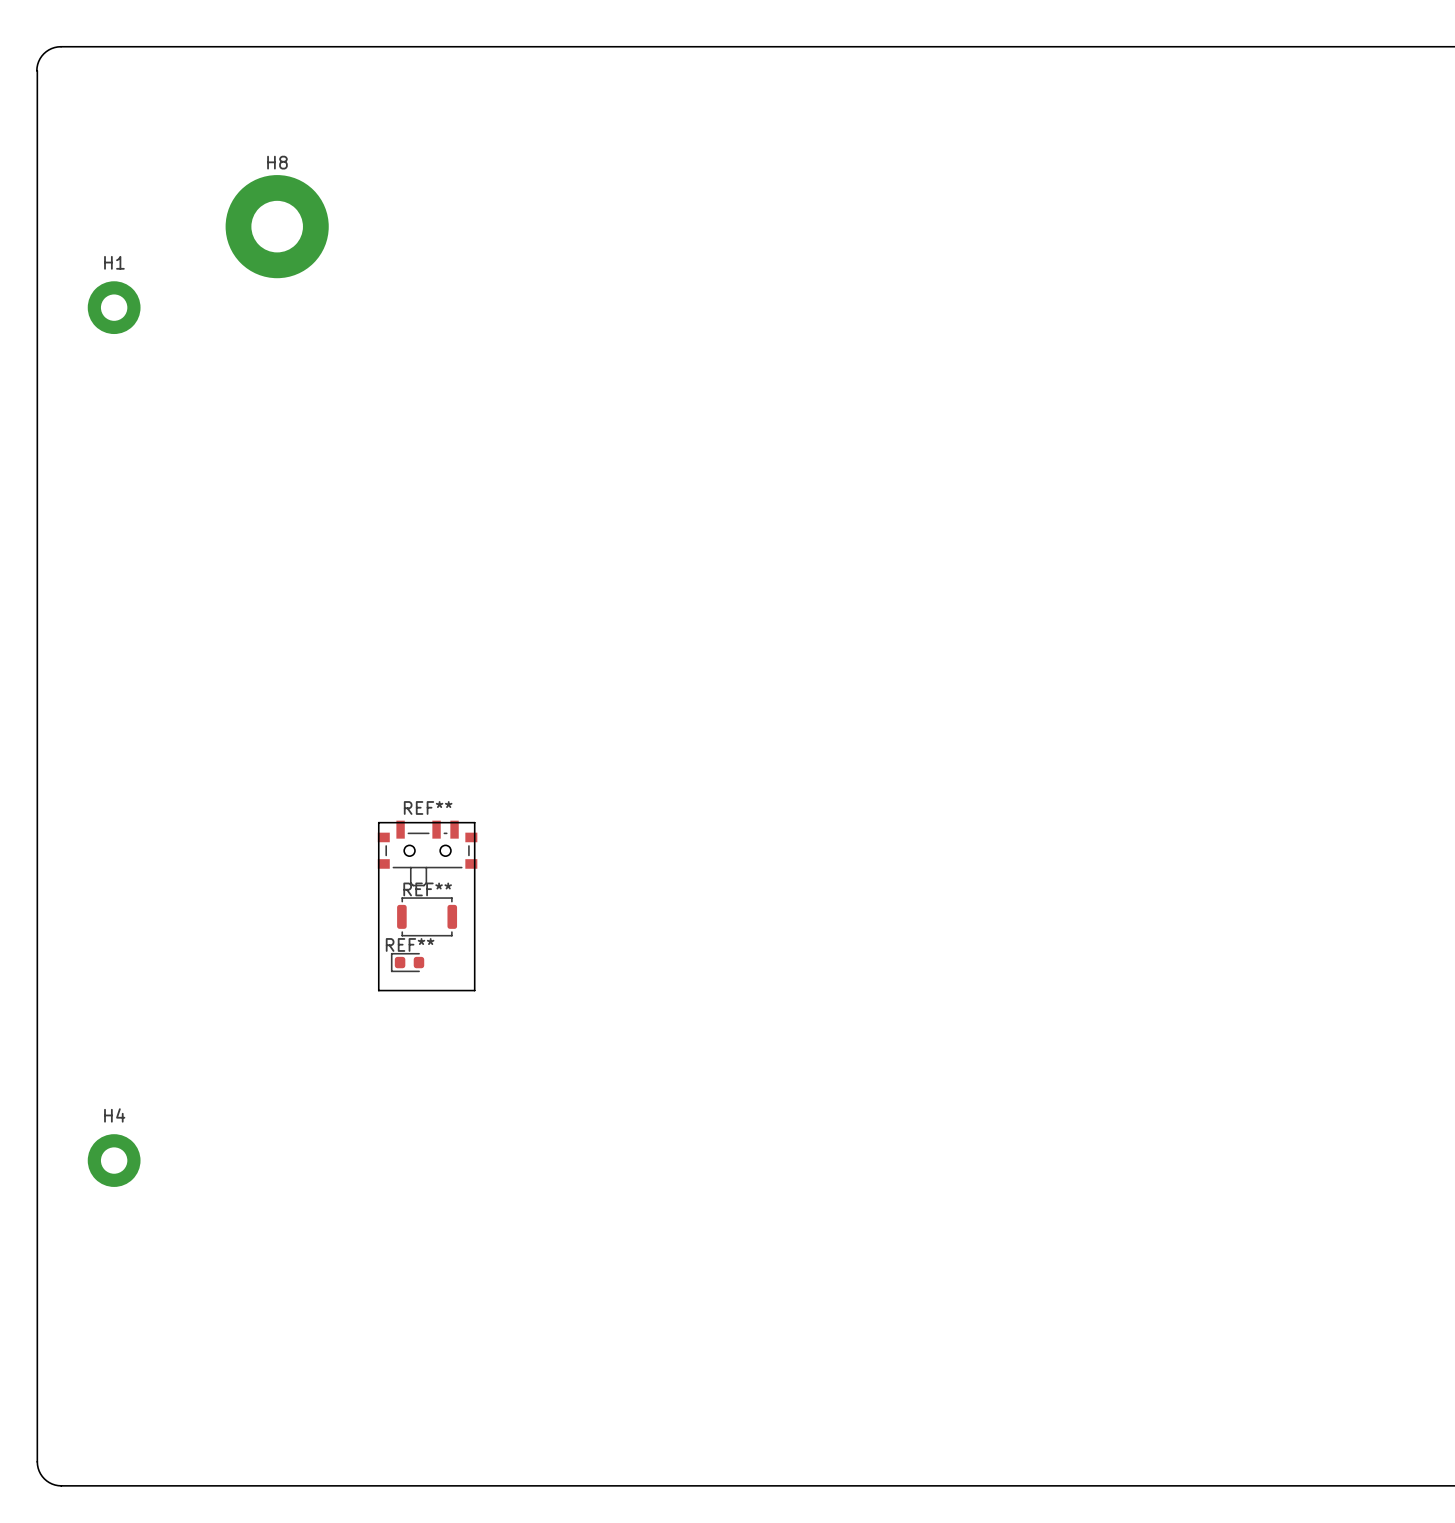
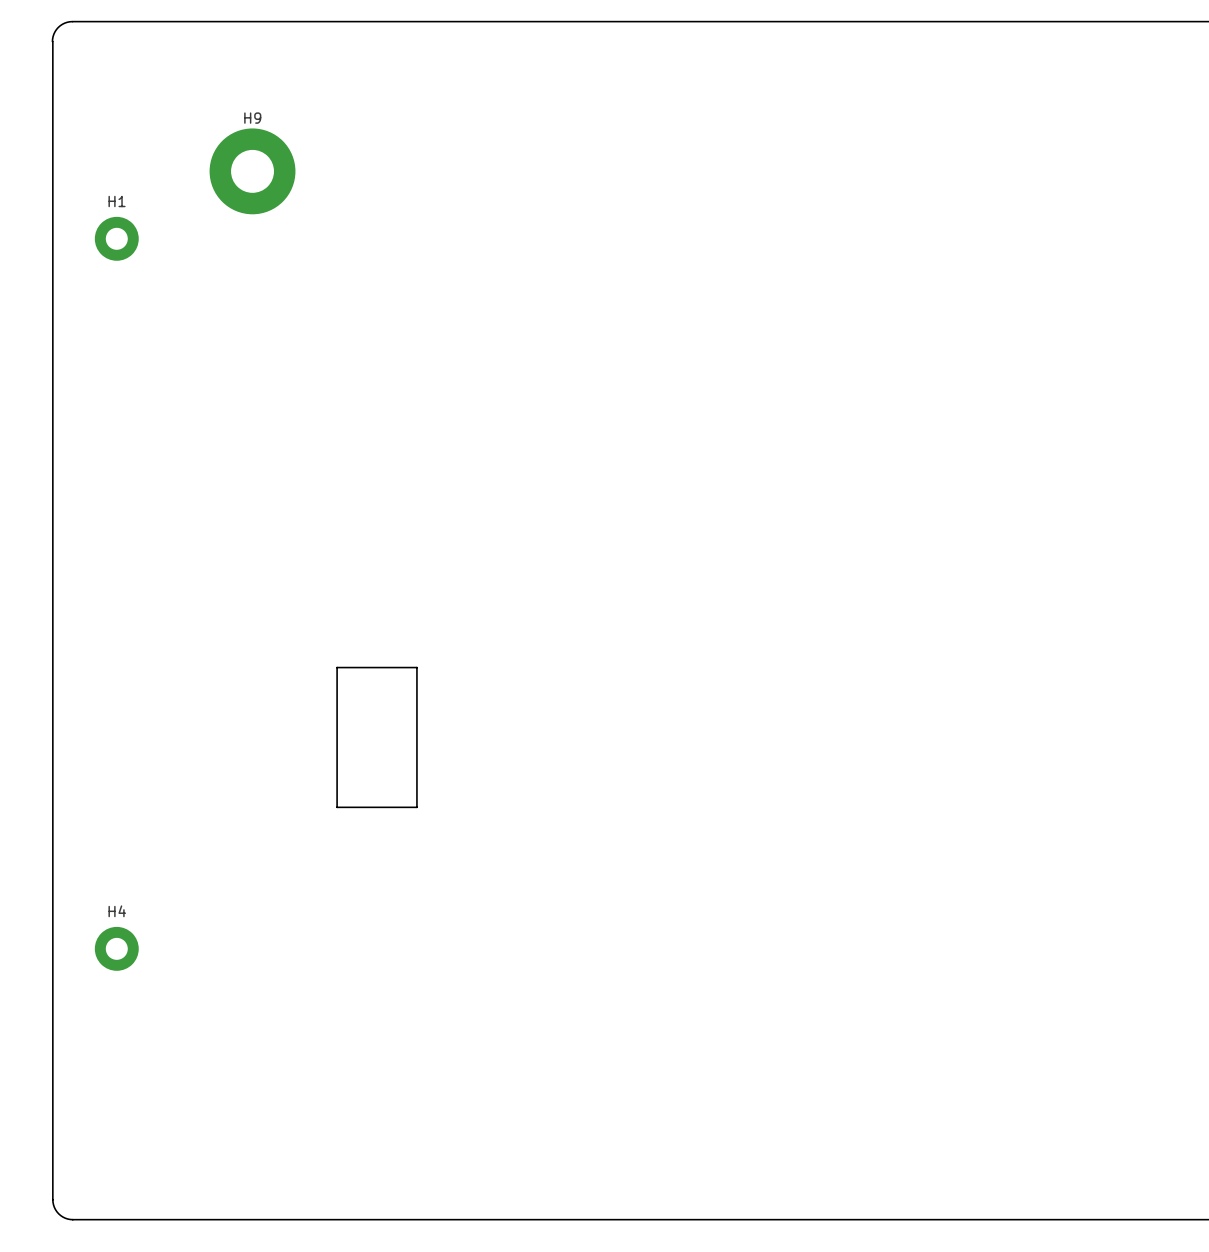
H8 name: H8 (277, 162) -> H9 (252, 118)
REF**: (427, 853) -> none
REF**: (427, 916) -> none
REF**: (407, 962) -> none

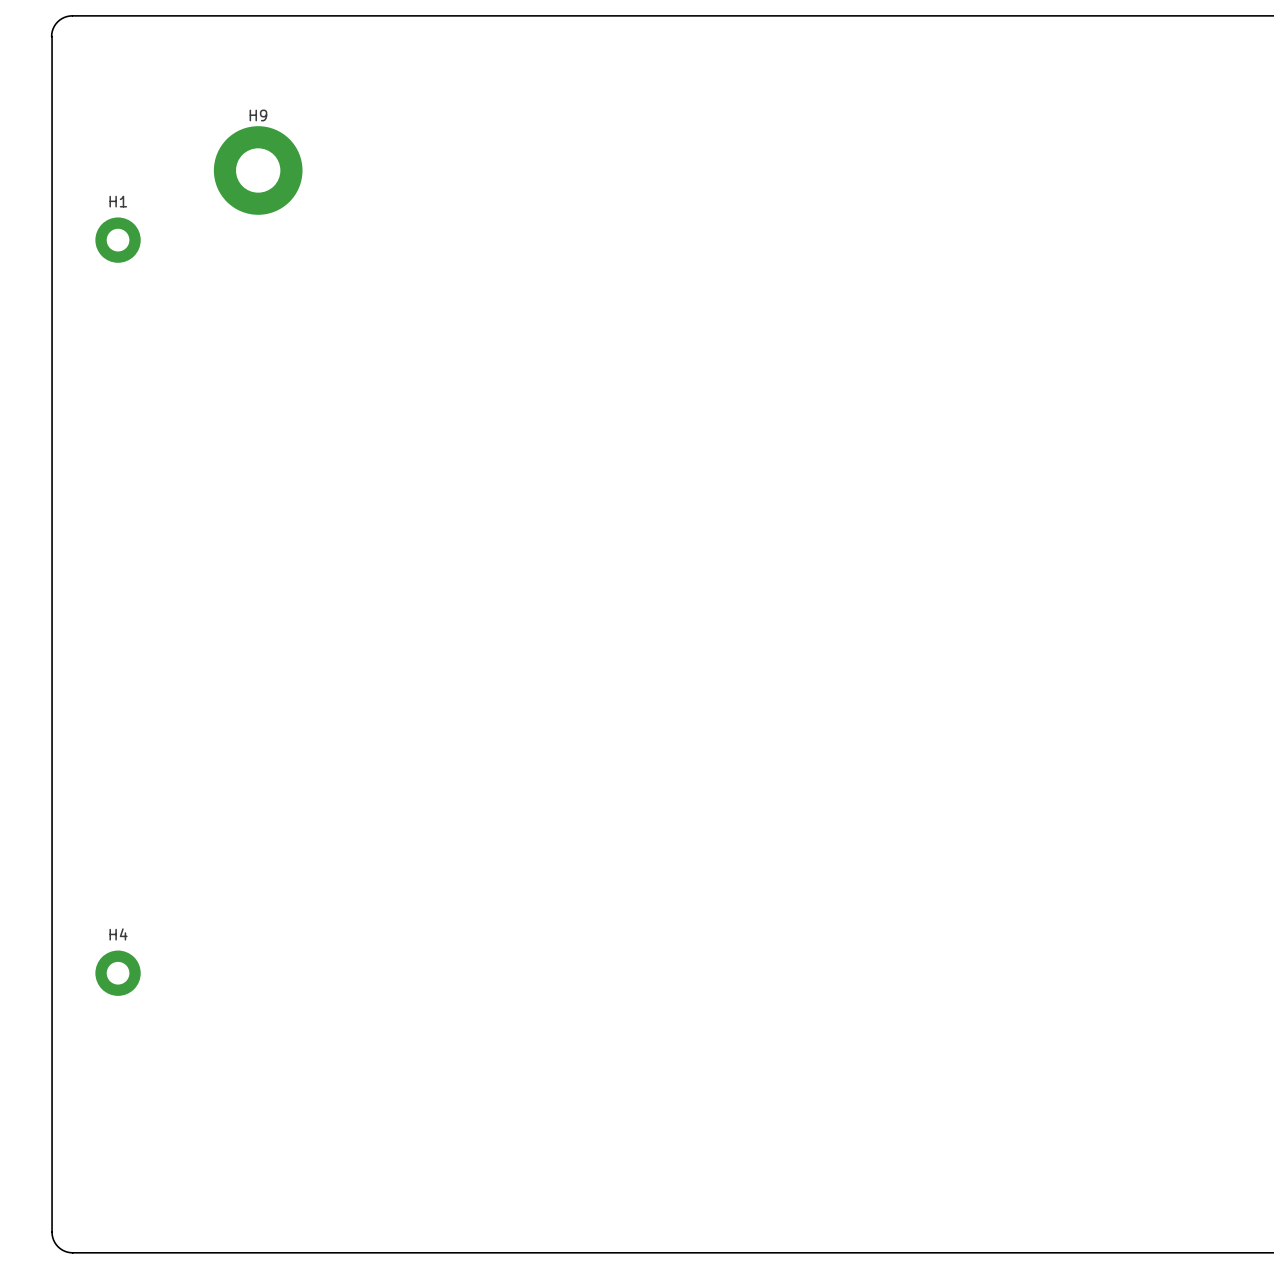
board edge: (337, 667) (337, 807) (416, 807) (416, 667) (337, 667) -> none

